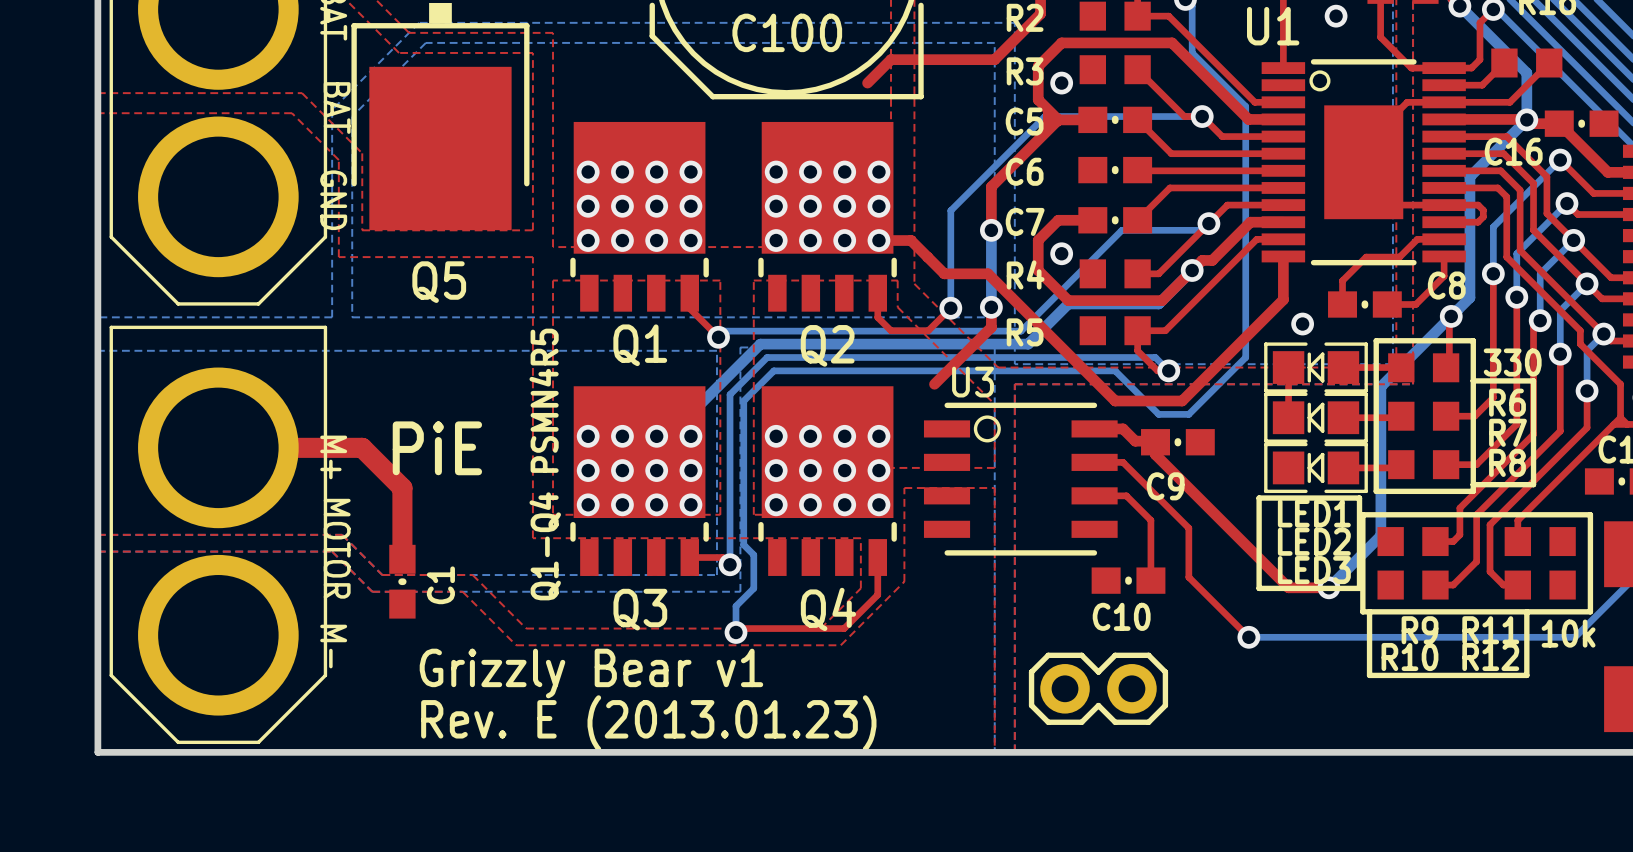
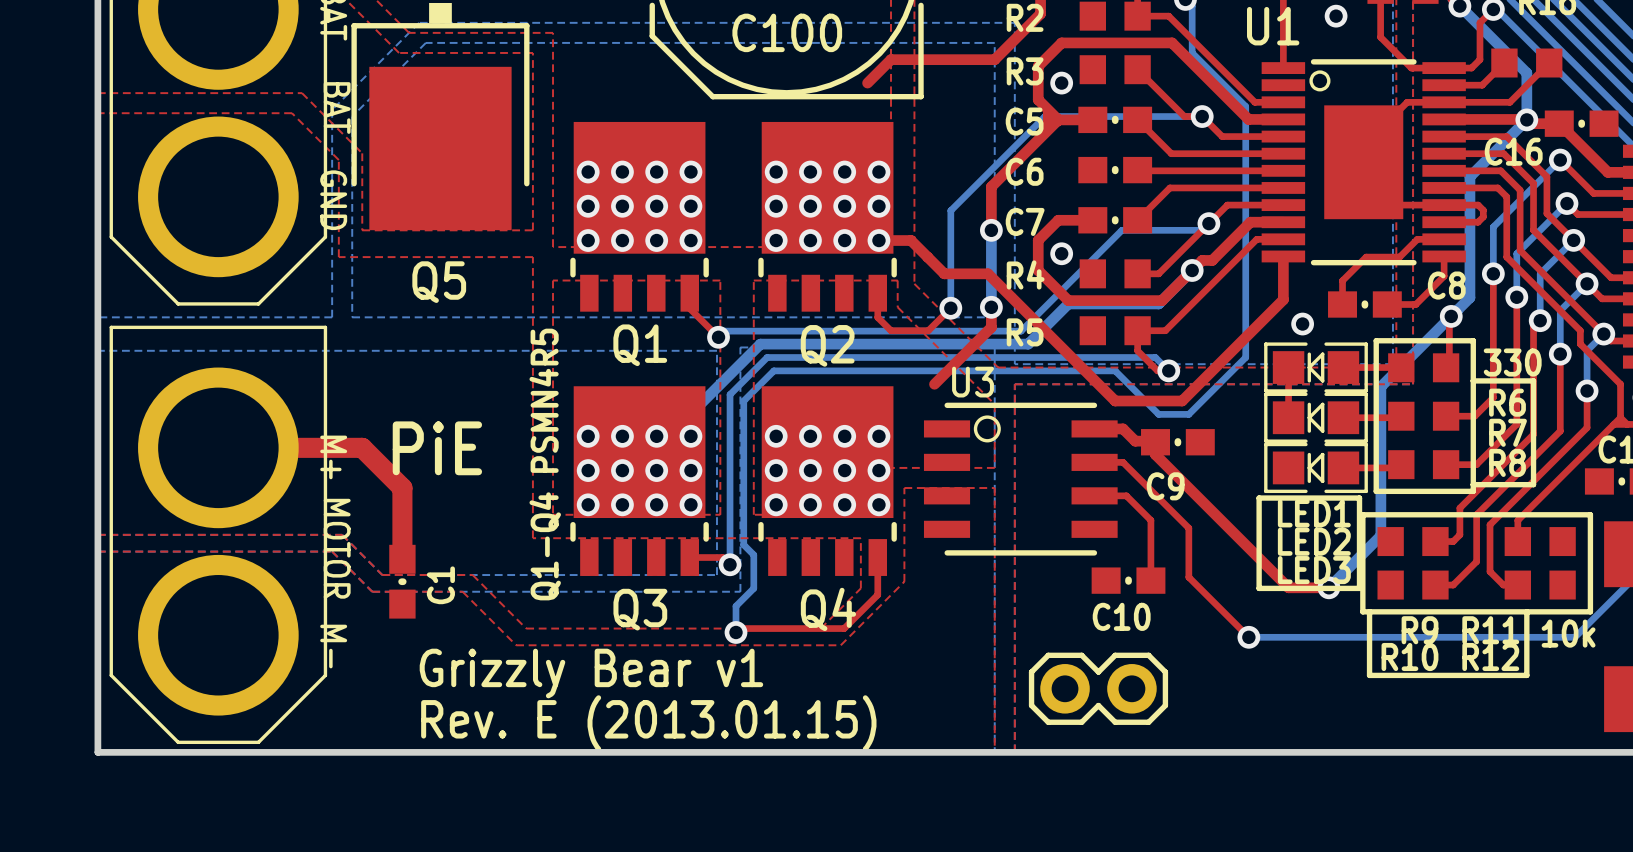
text: Rev. E (2013.01.23) (648, 723) -> Rev. E (2013.01.15) (648, 723)

